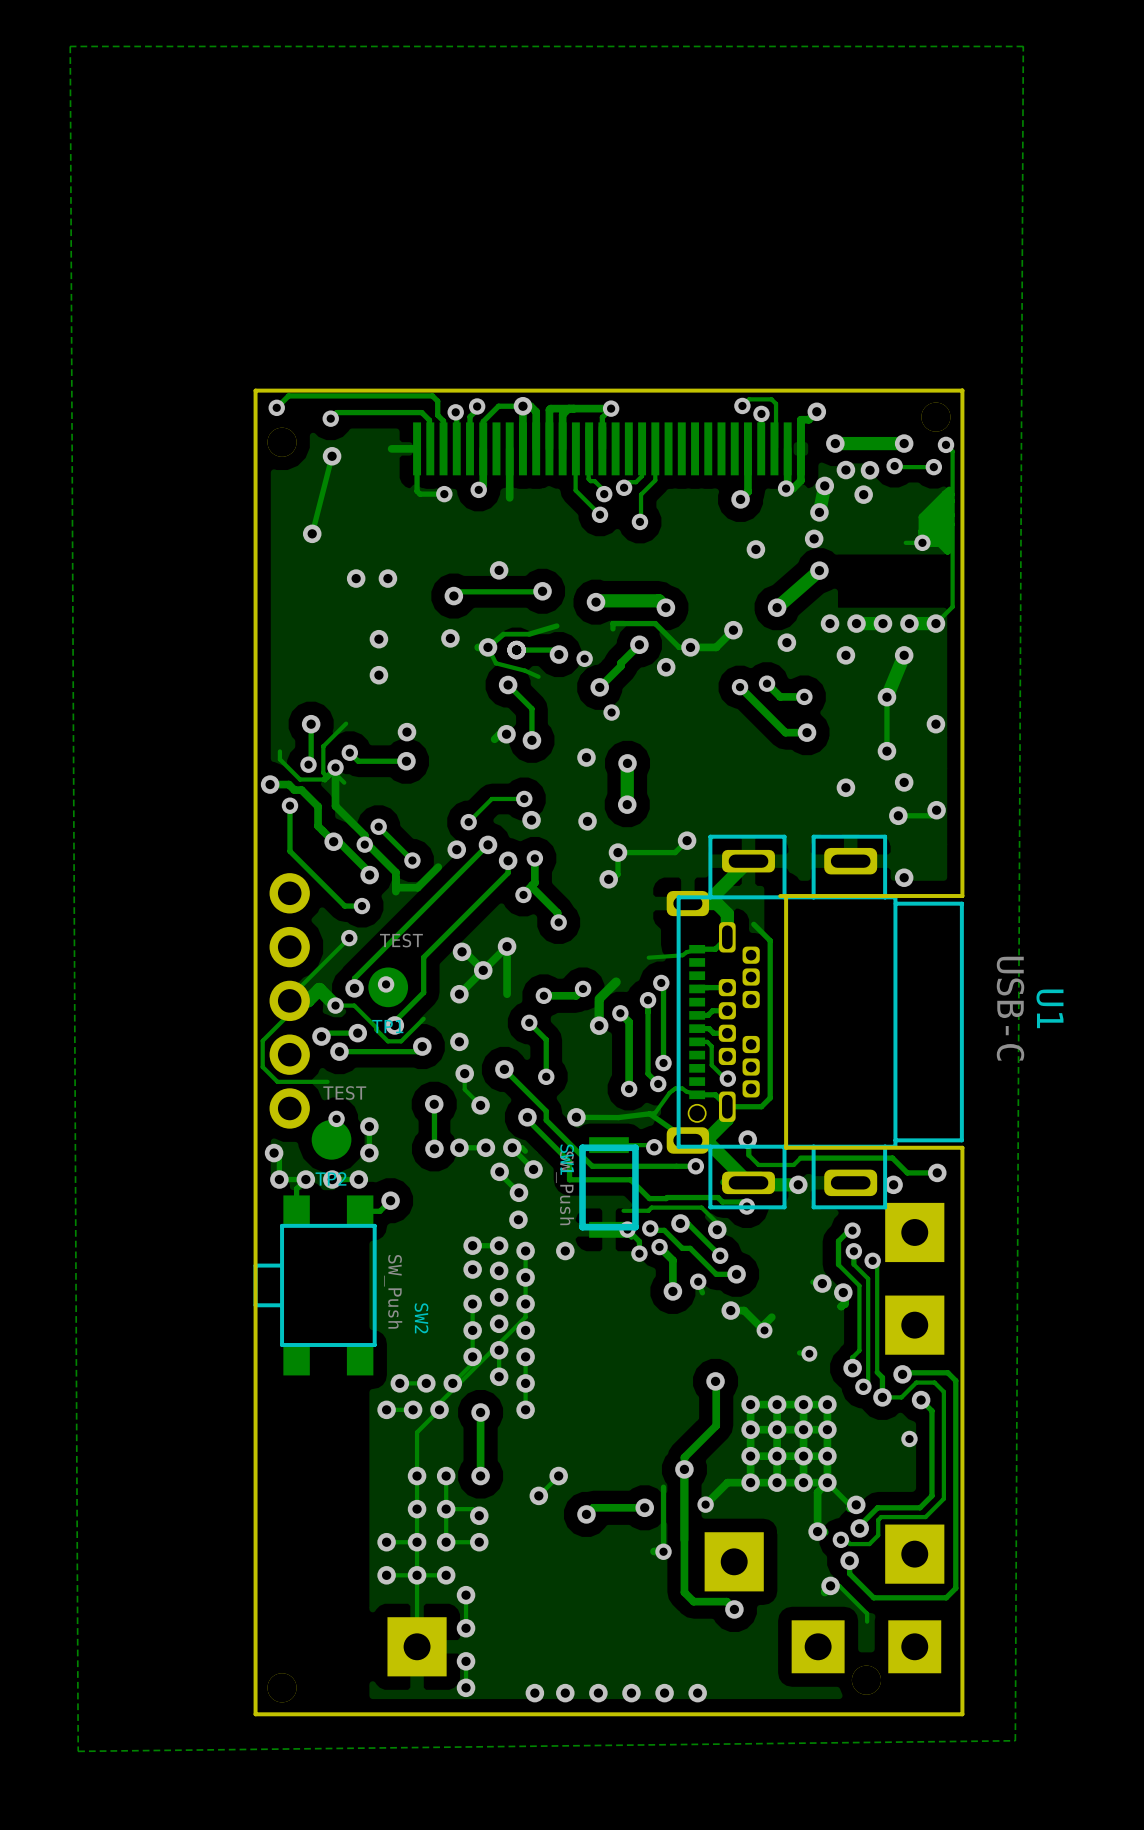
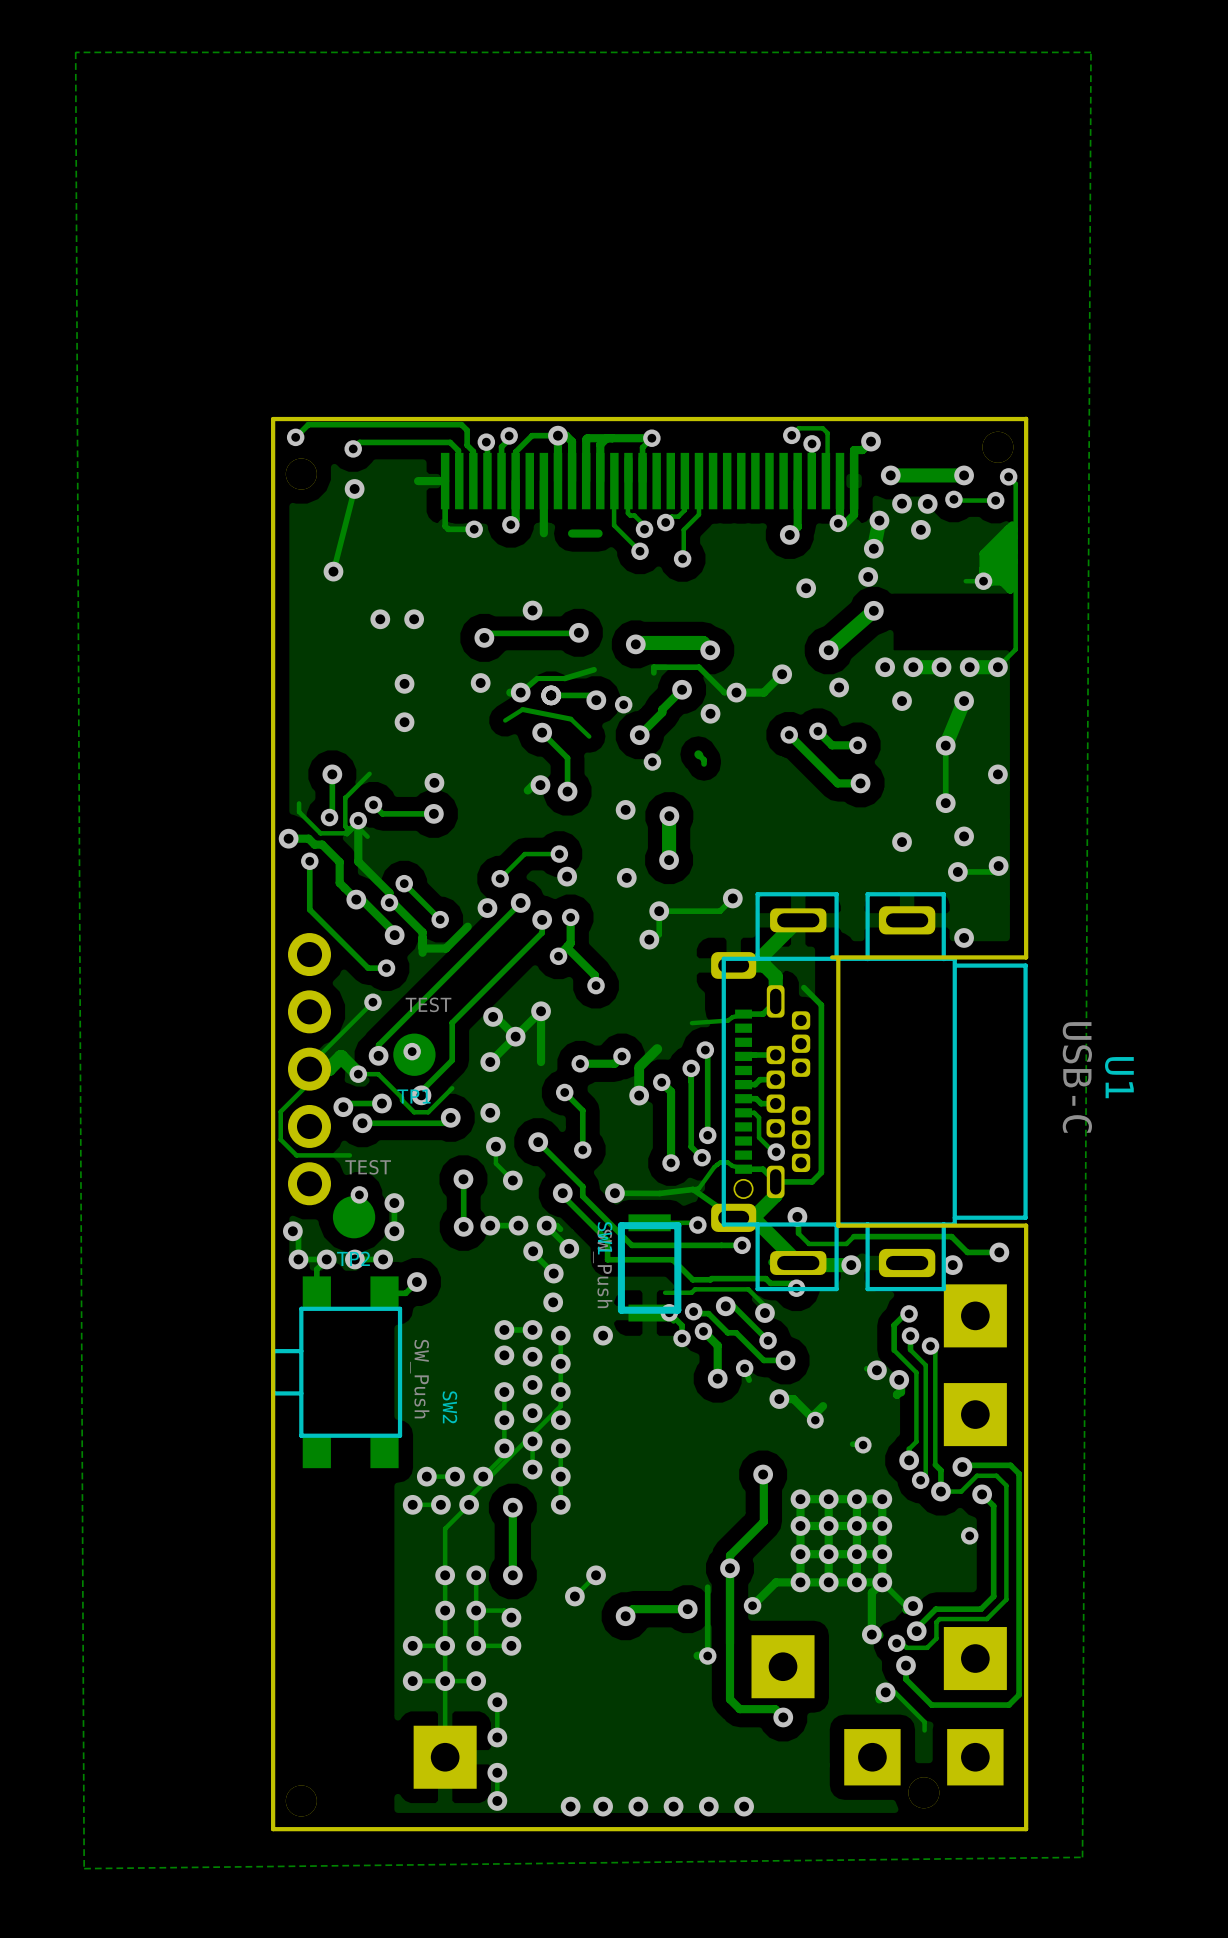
track: none -> (598, 533) (572, 533)
track: (488, 647) (495, 663) (525, 670) (538, 676) -> none
track: none -> (505, 720) (522, 709) (570, 719) (589, 736)
track: none -> (699, 755) (704, 760) (704, 763)

